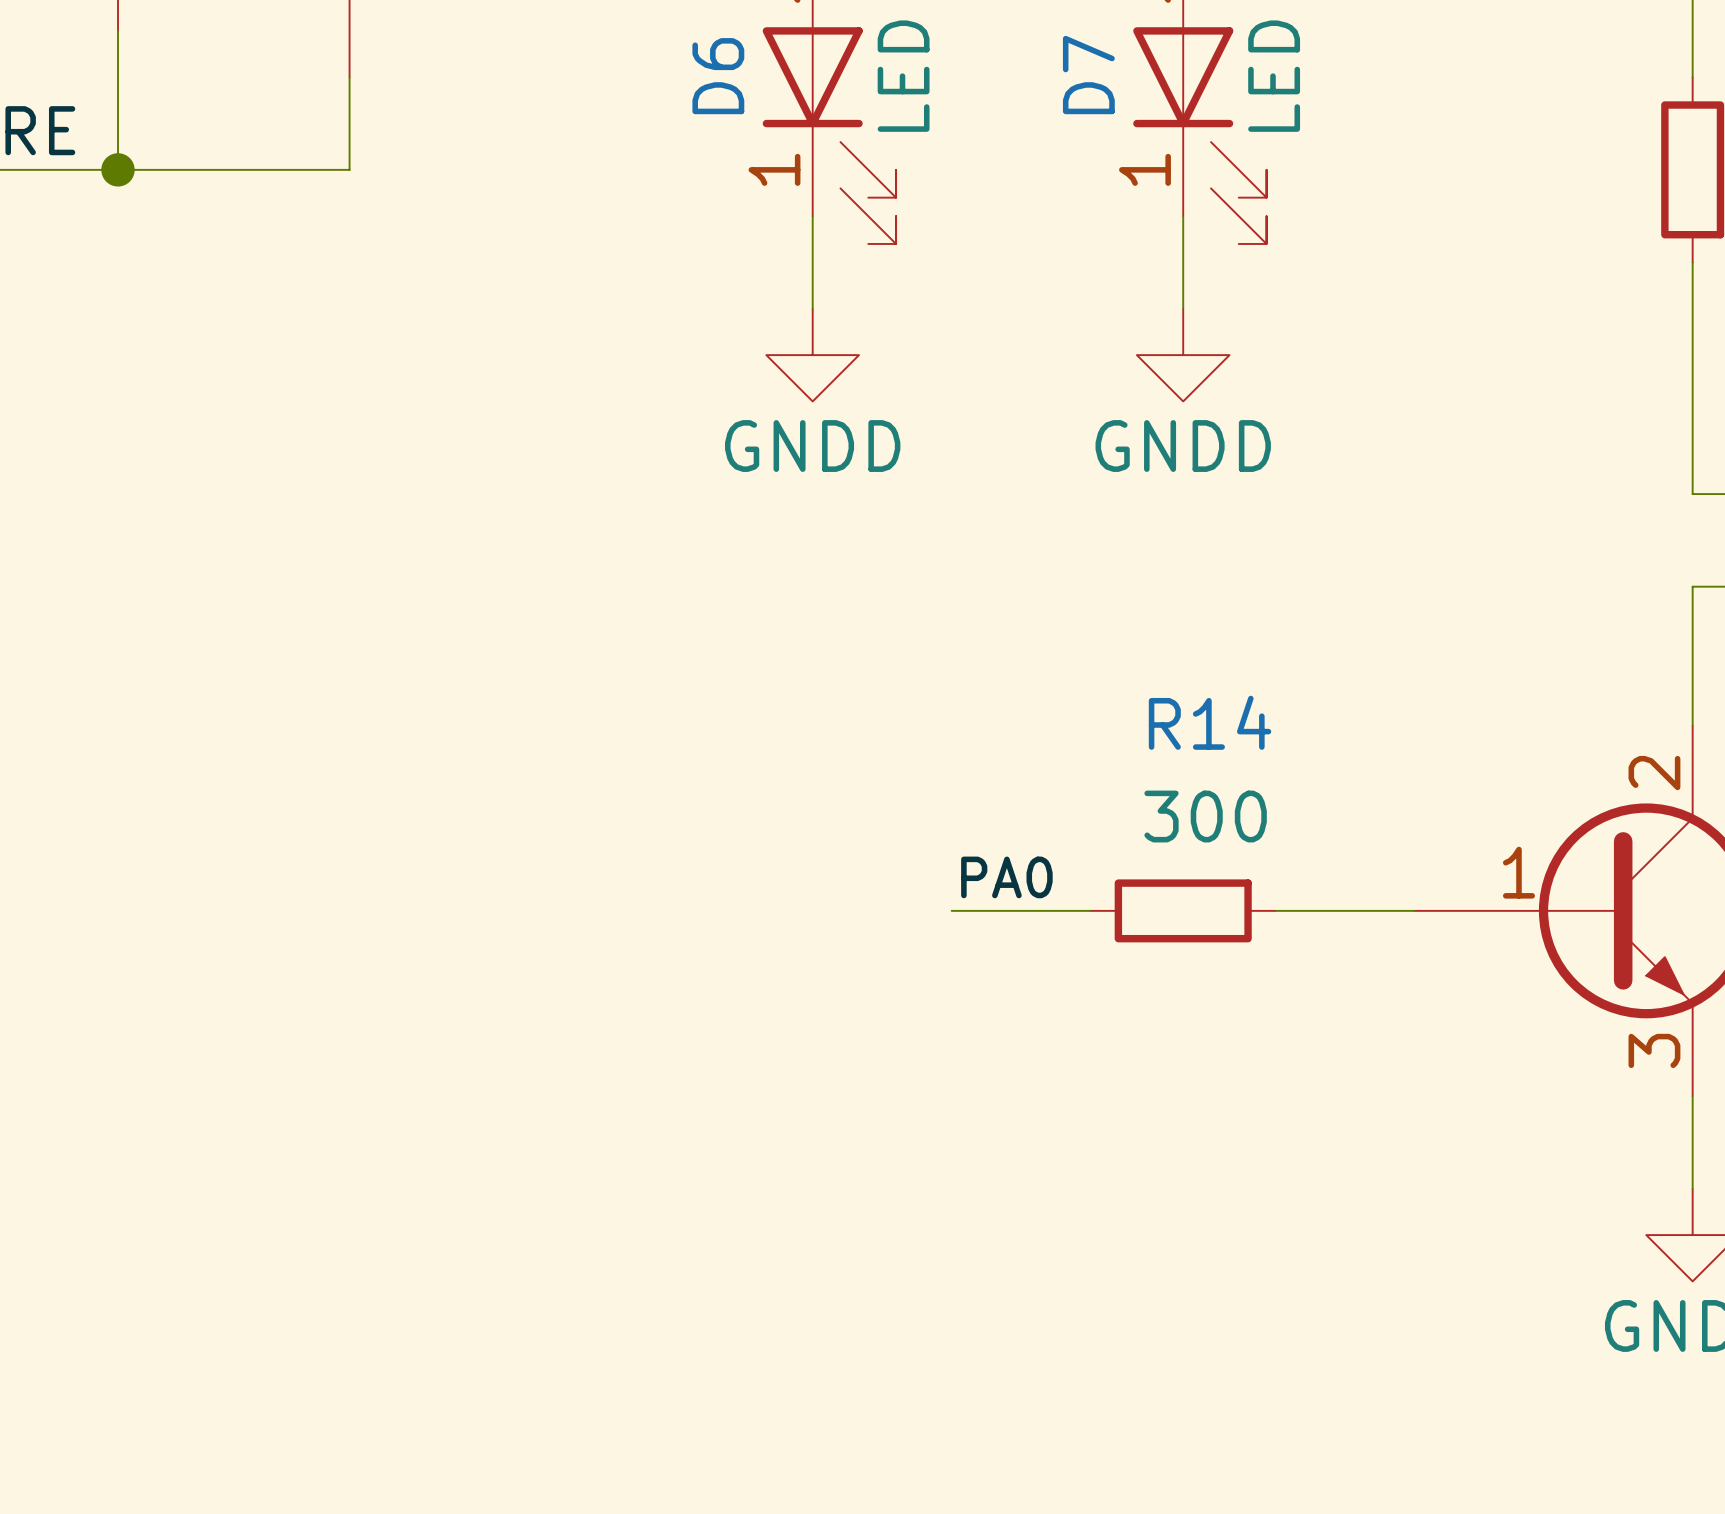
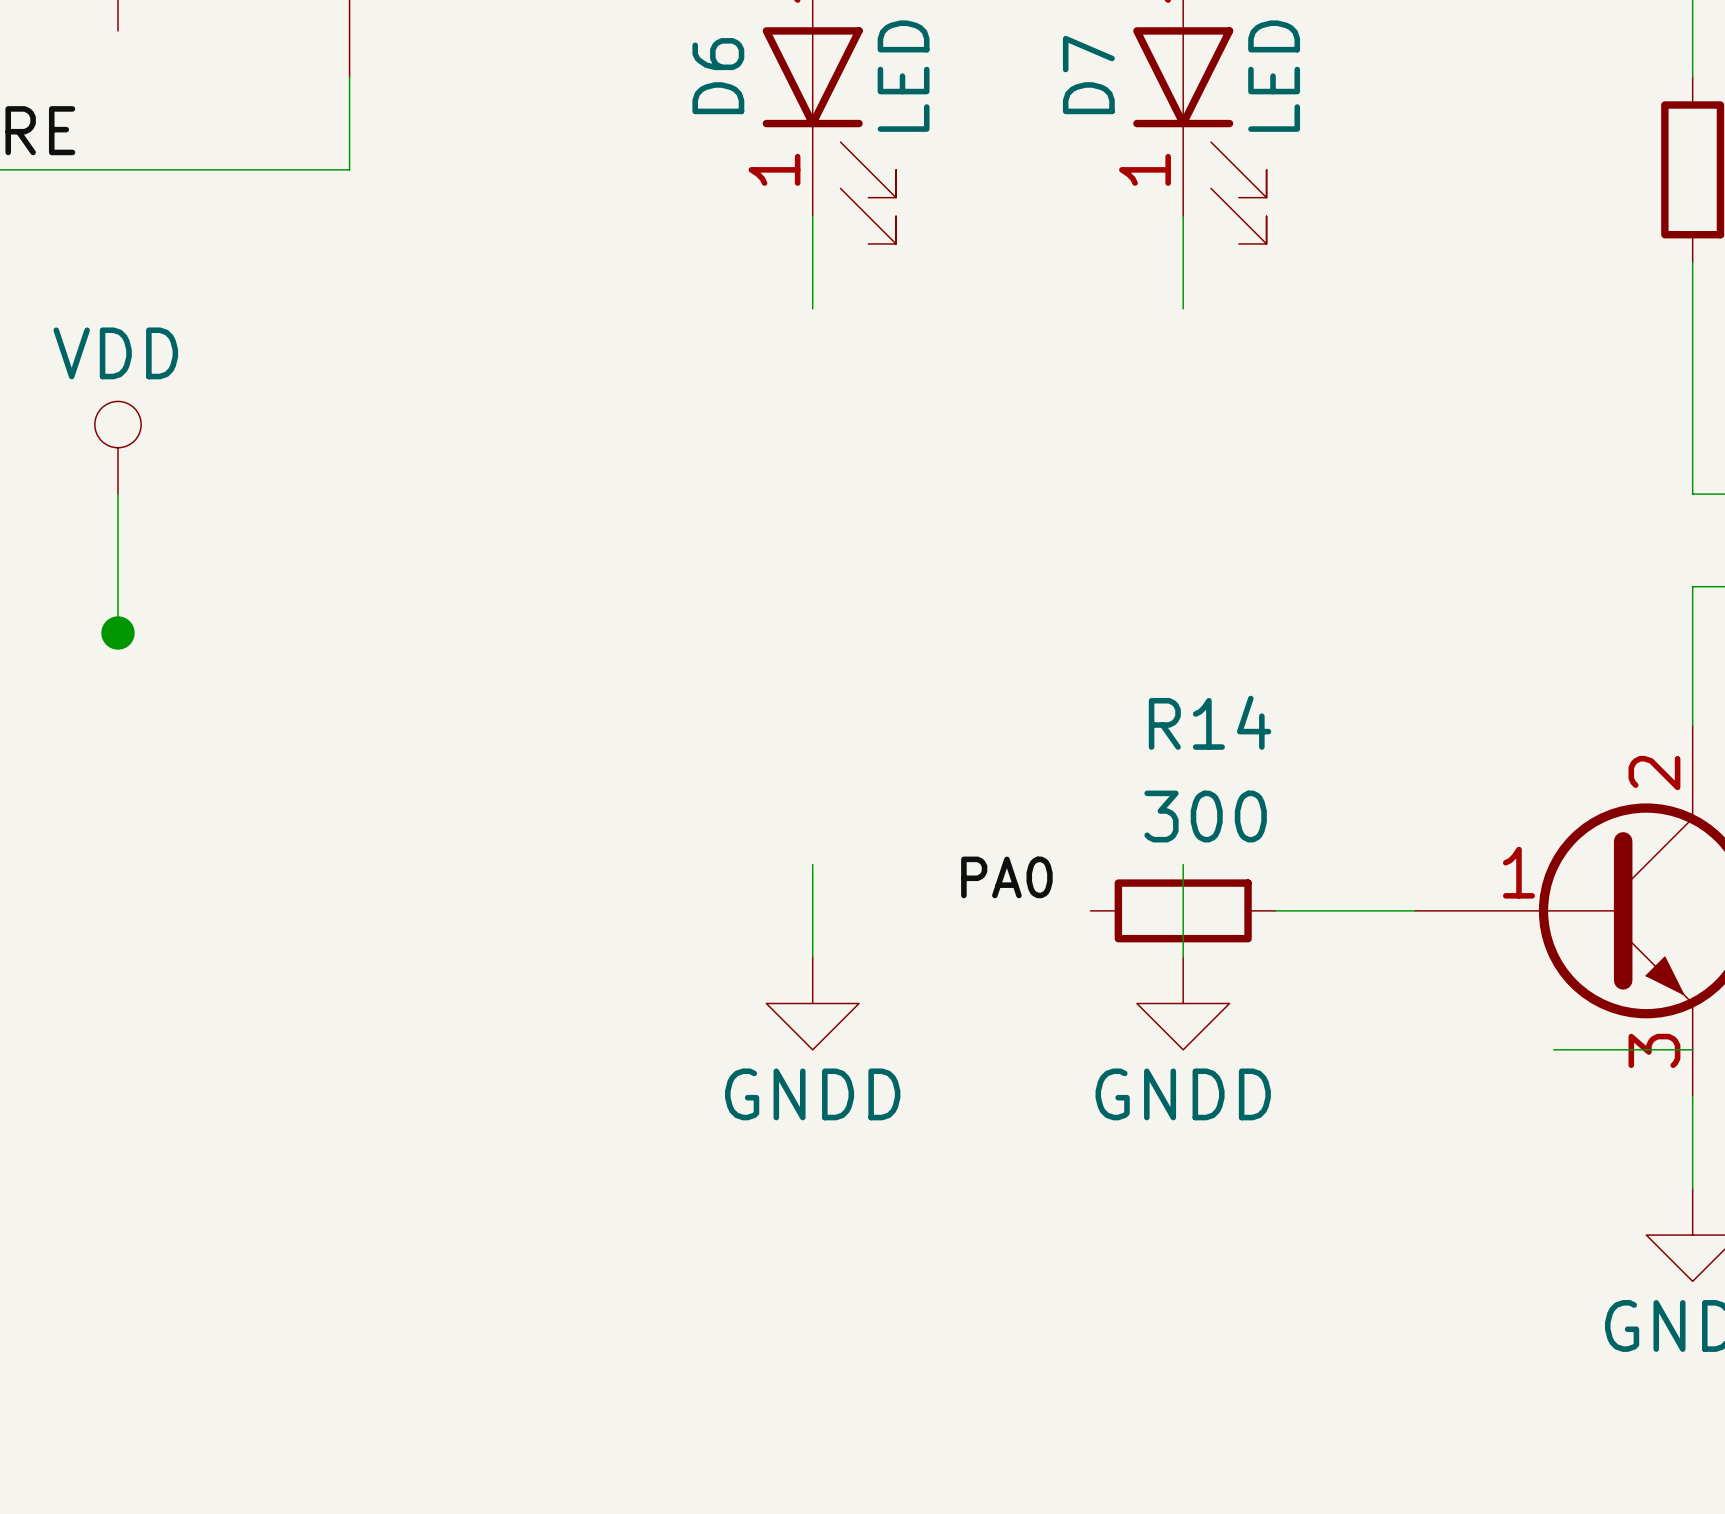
wire: (118, 30) (118, 169) -> (118, 494) (118, 633)
junction: (118, 169) -> none
power symbol: GNDD (812, 355) -> none
power symbol: GNDD (1183, 355) -> none
power symbol: none -> VDD (118, 447)
junction: none -> (118, 633)
wire: none -> (812, 864) (812, 957)
wire: none -> (1183, 864) (1183, 957)
wire: (951, 910) (1090, 910) -> (1553, 1049) (1692, 1049)
power symbol: none -> GNDD (812, 1003)
power symbol: none -> GNDD (1183, 1003)

